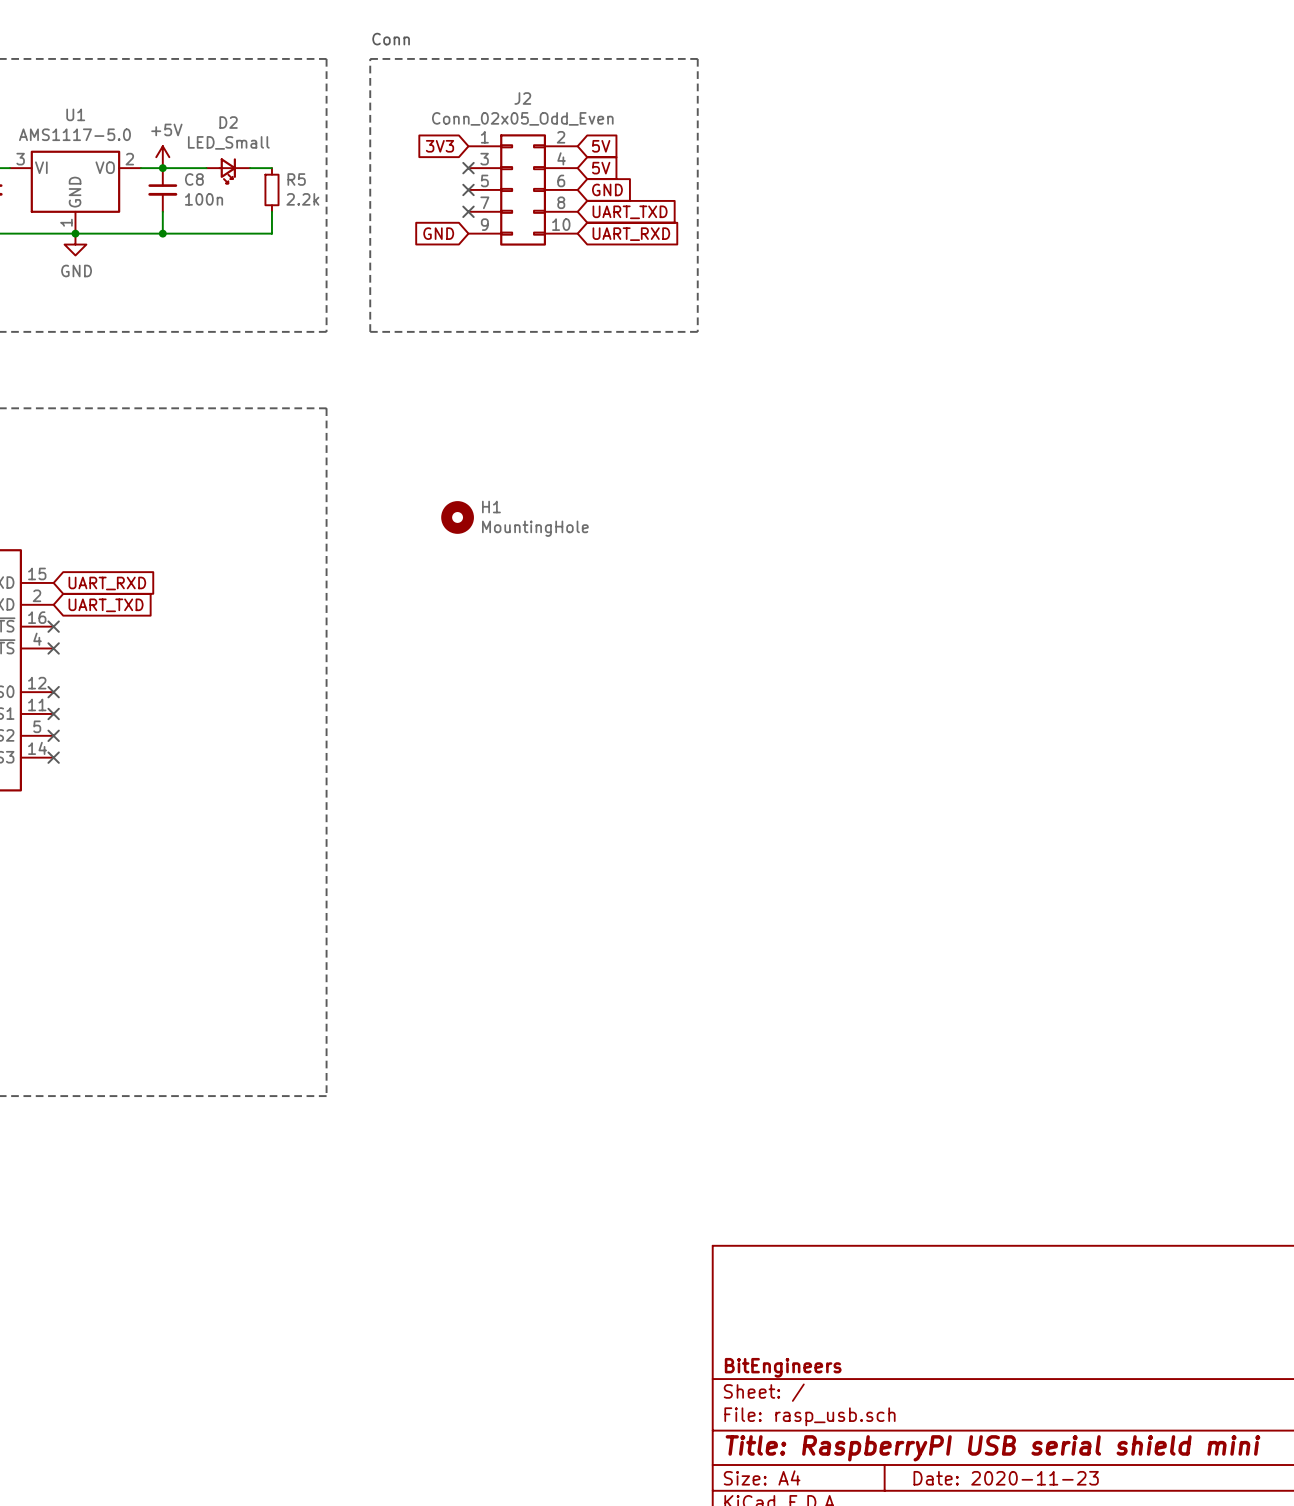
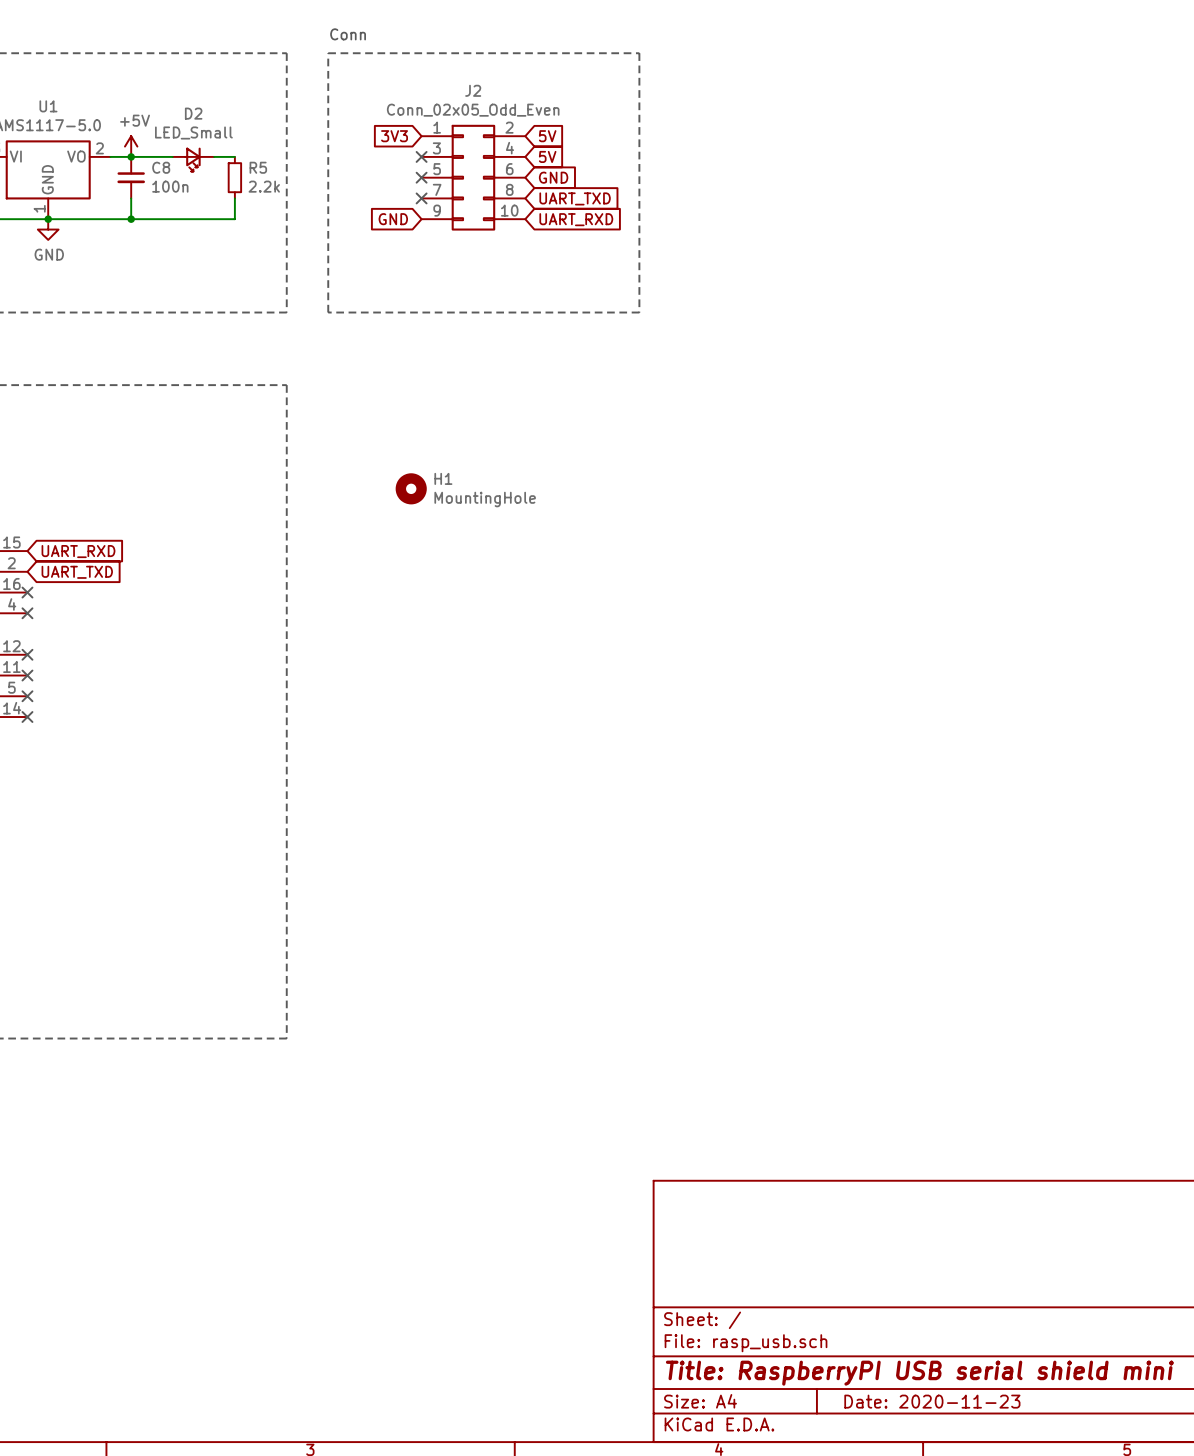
title block: BitEngineers (783, 1367) -> none

